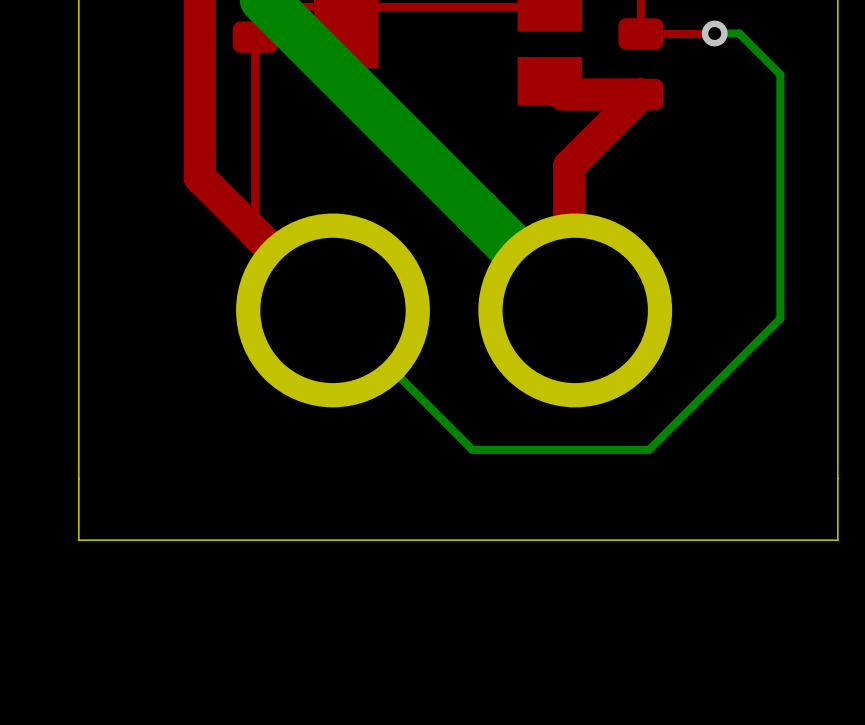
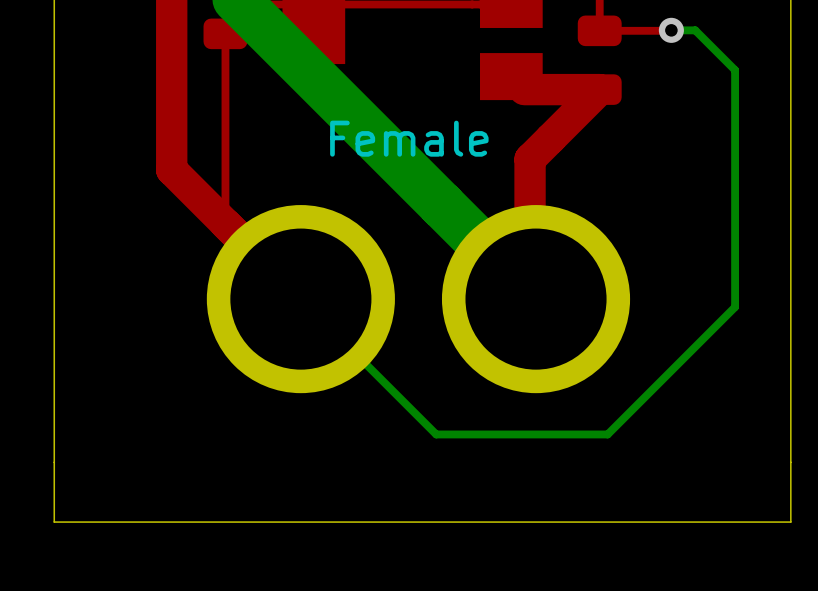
text: none -> Female (409, 138)

